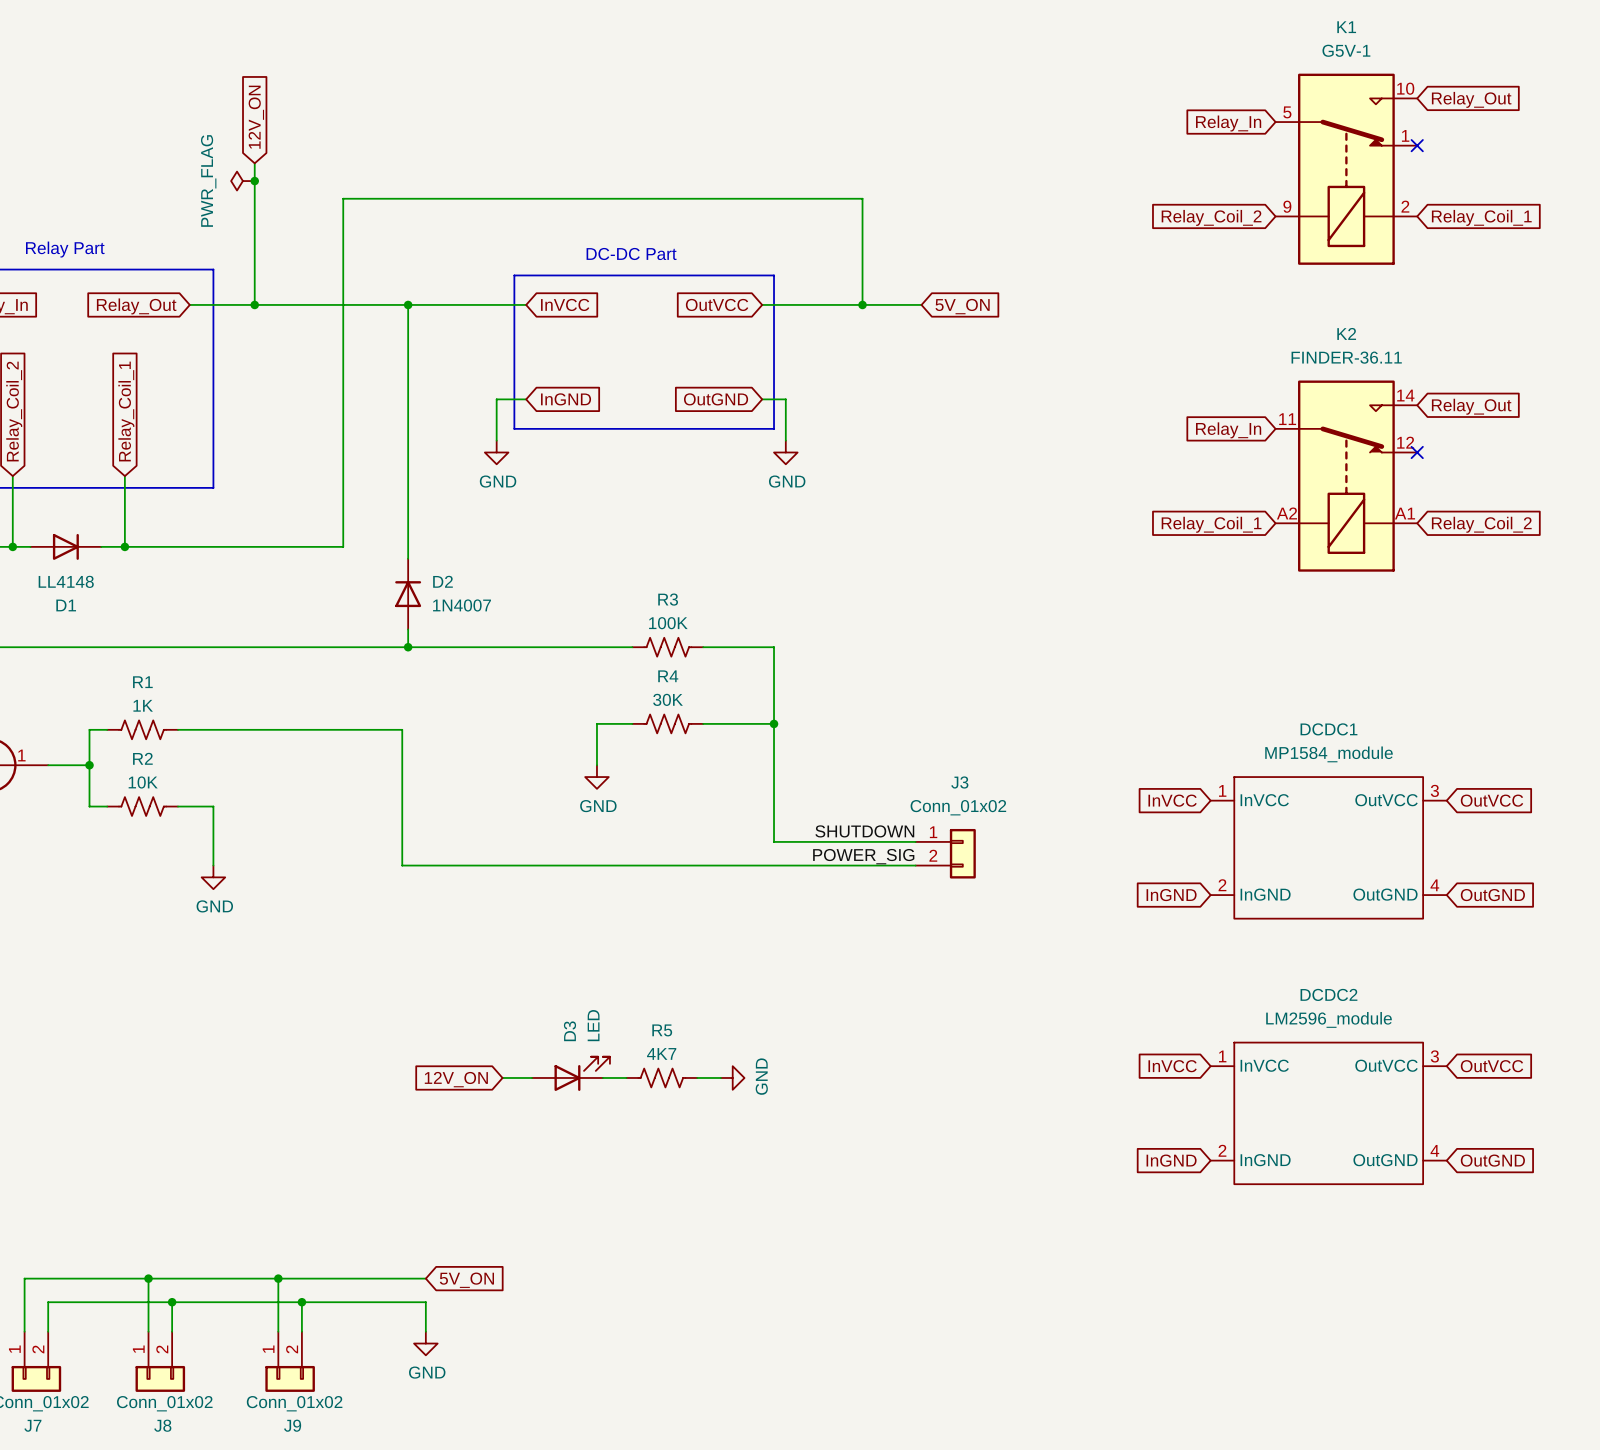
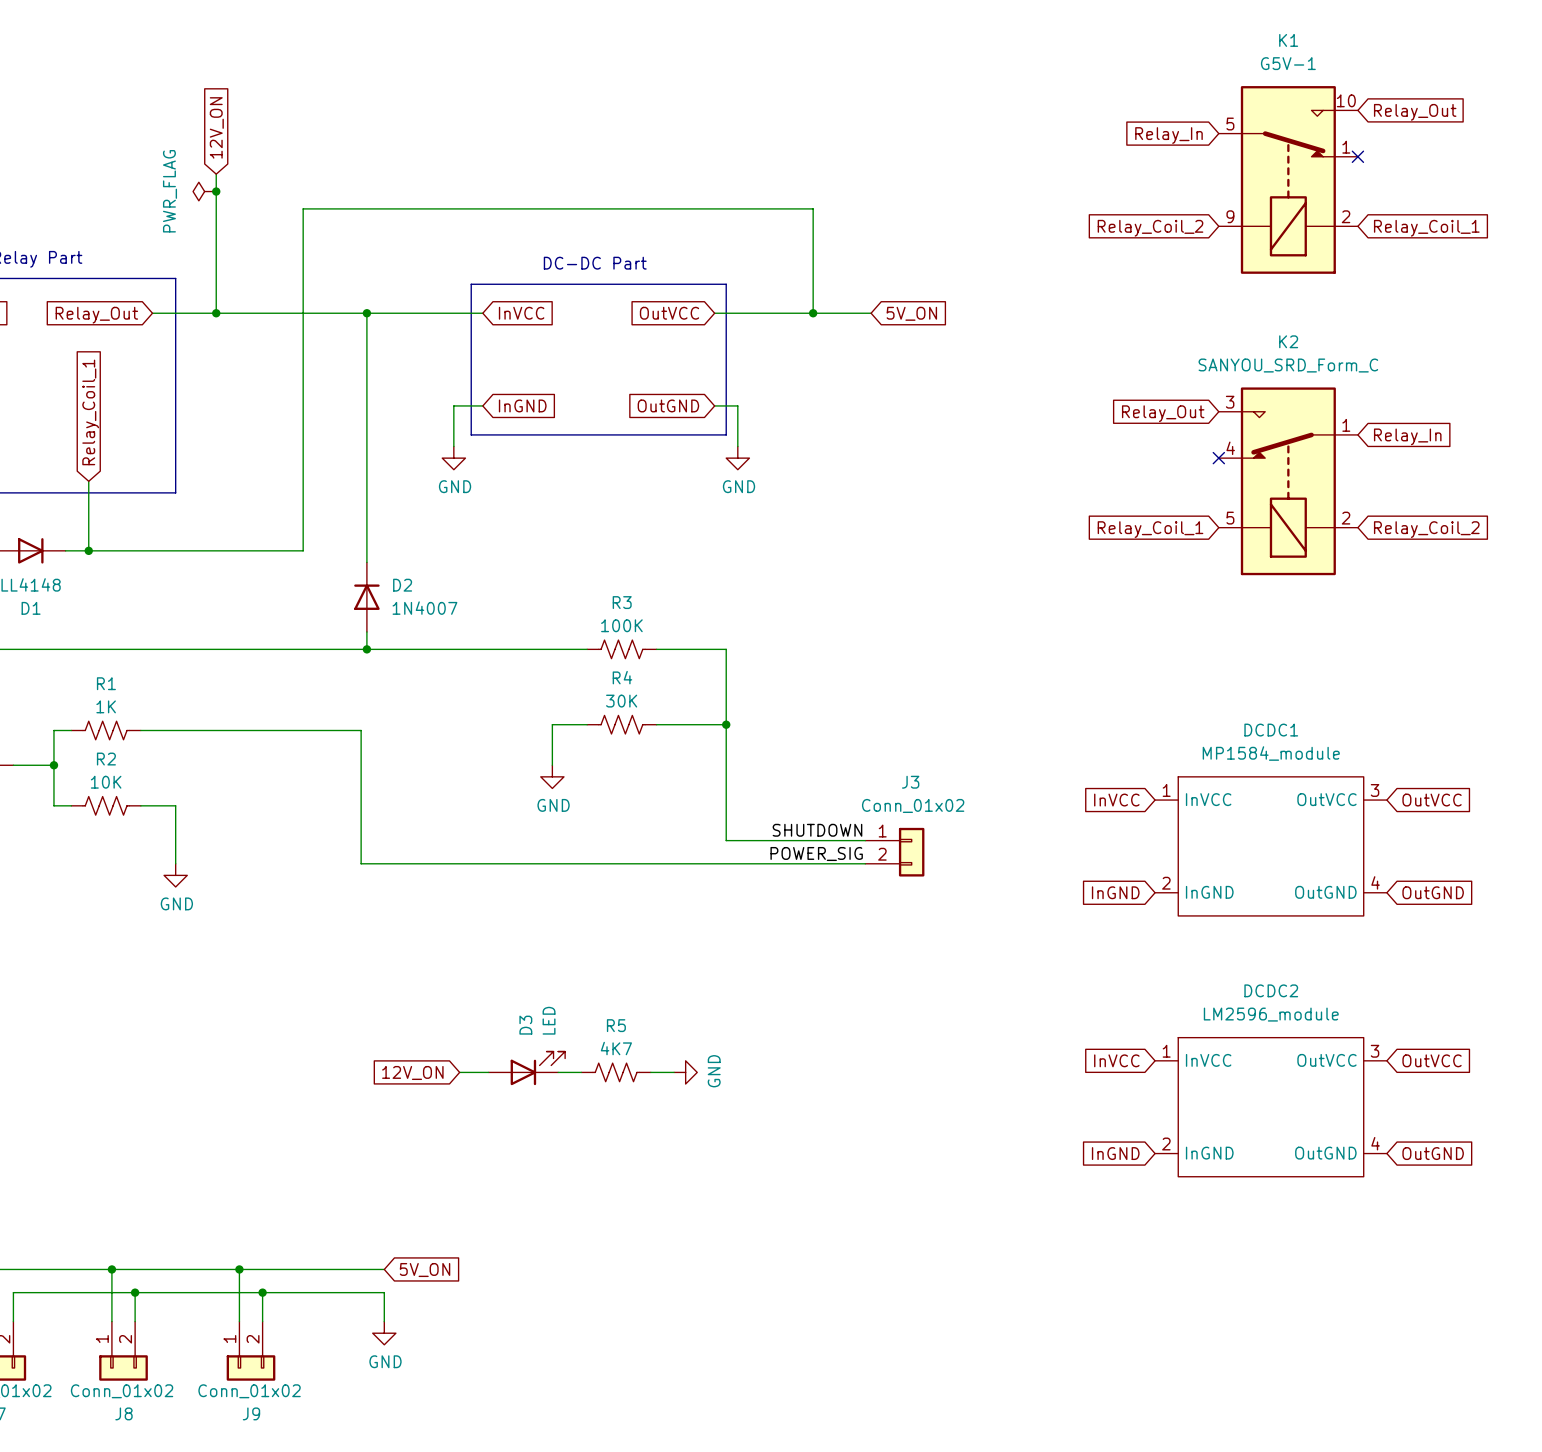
K2 value: FINDER-36.11 (1346, 357) -> SANYOU_SRD_Form_C (1288, 365)
K2 symbol: [1275, 380, 1418, 572] -> [1218, 387, 1358, 576]
global label rotation: 0° (1471, 406) -> 180° (1163, 413)
global label position: Relay_Out (1471, 406) -> Relay_Out (1163, 413)
global label rotation: 0° (1228, 430) -> 180° (1407, 436)
global label position: Relay_In (1228, 430) -> Relay_In (1407, 436)
no-connect mark: none -> (1218, 458)
no-connect mark: (1417, 452) -> none

